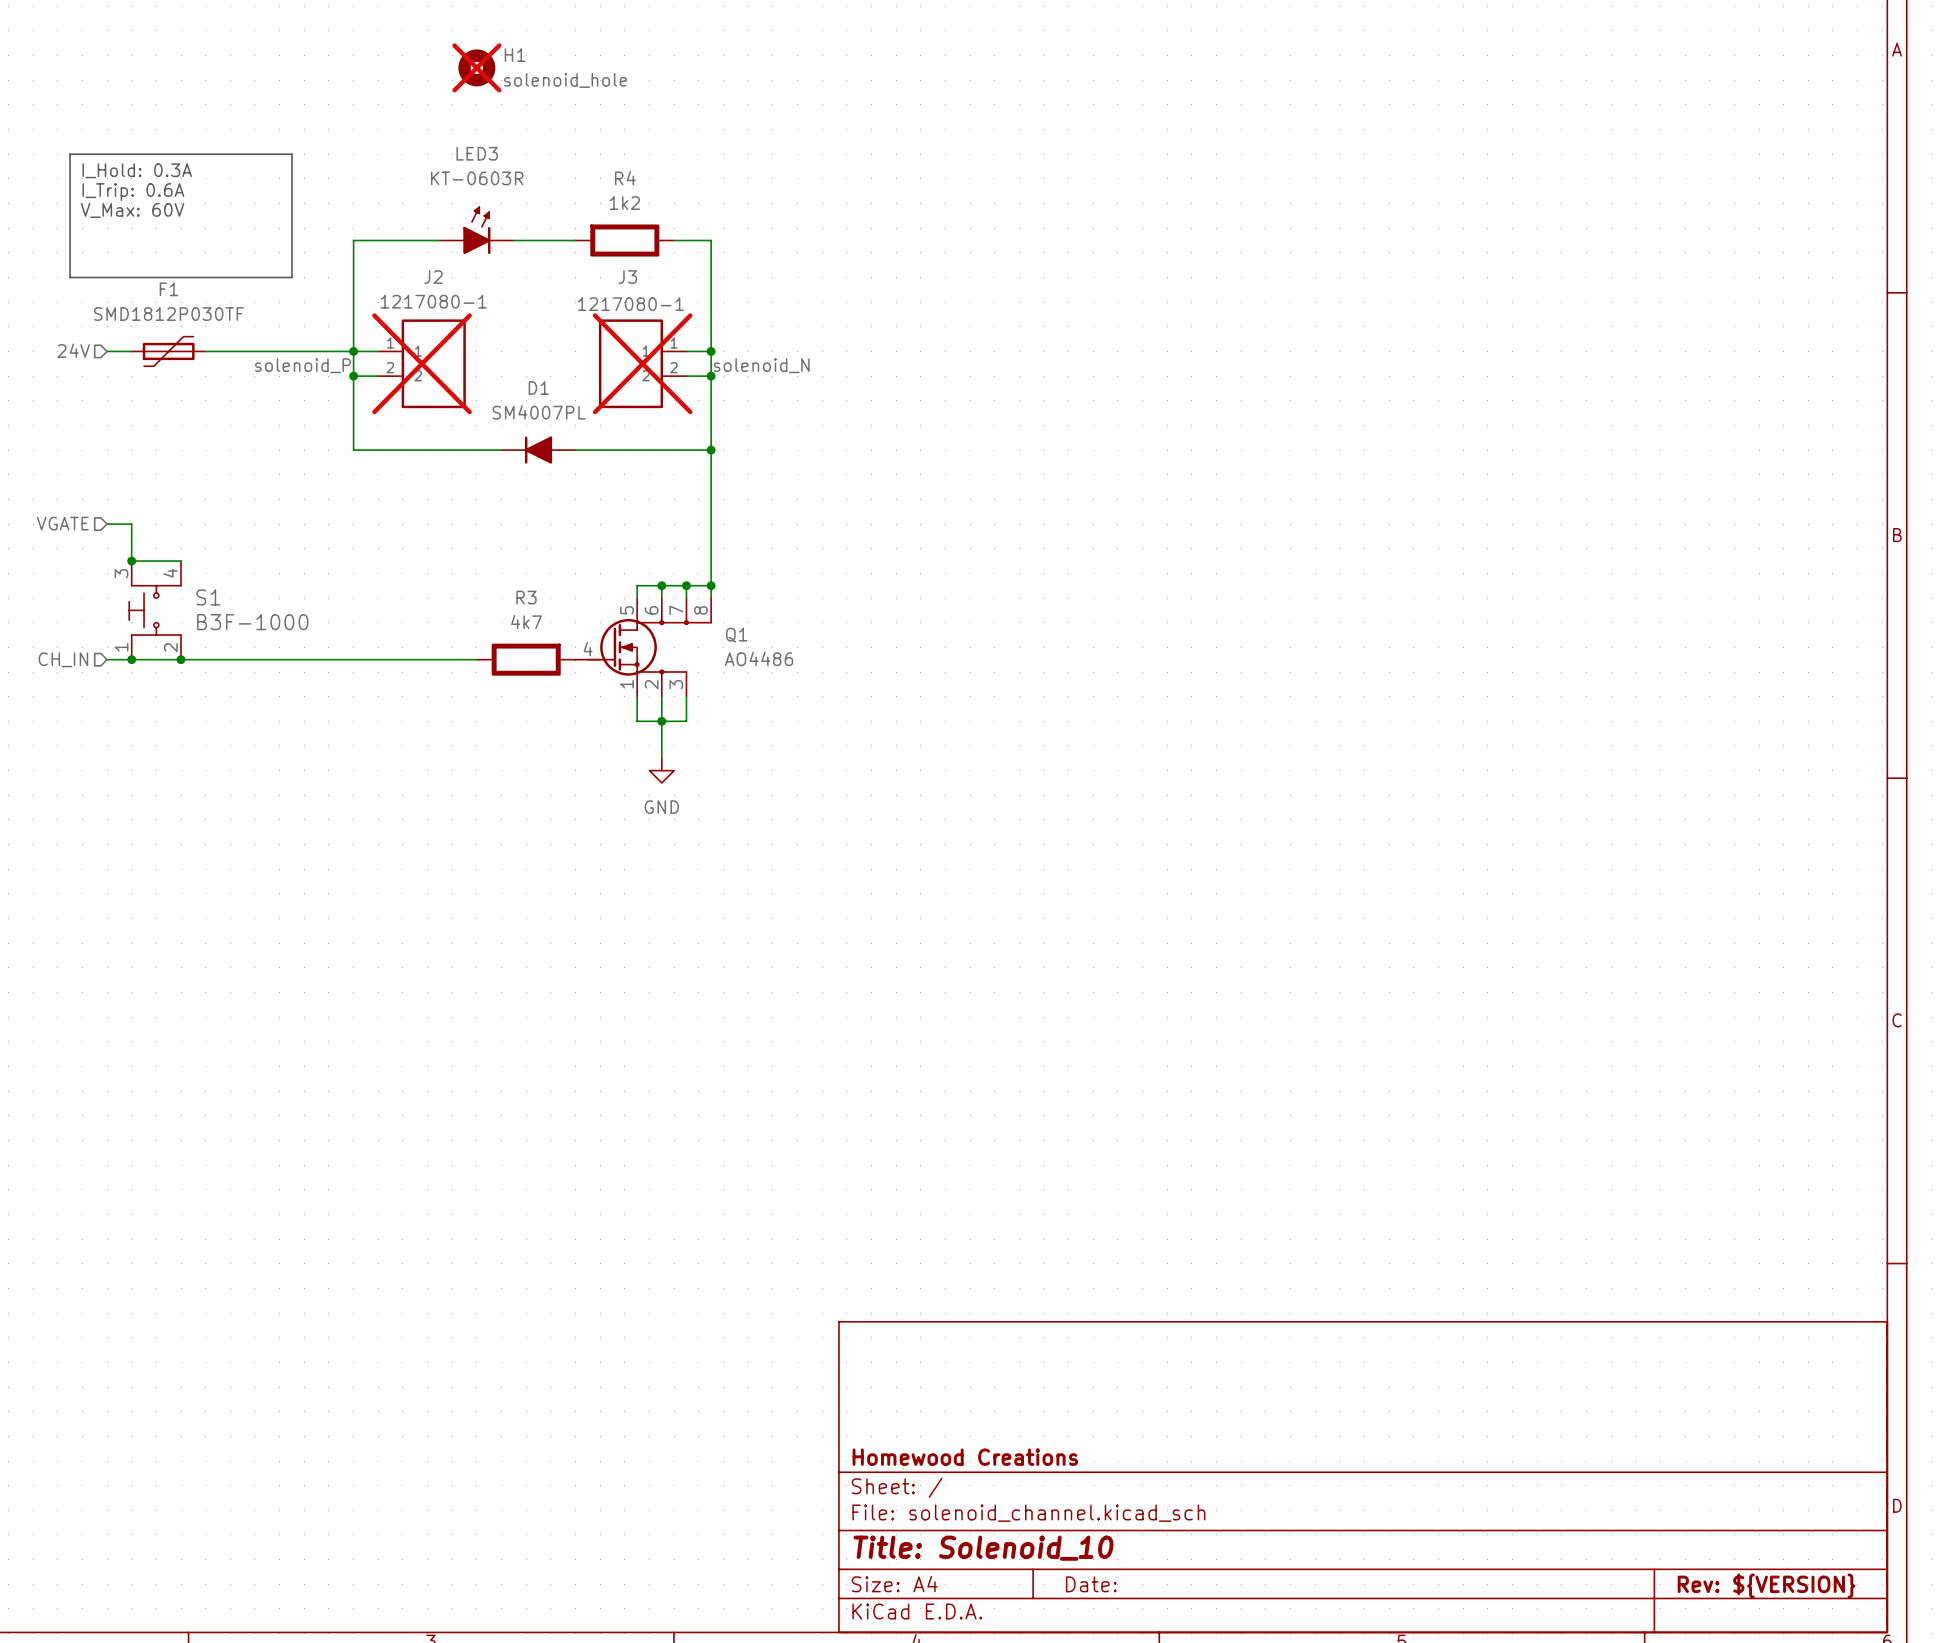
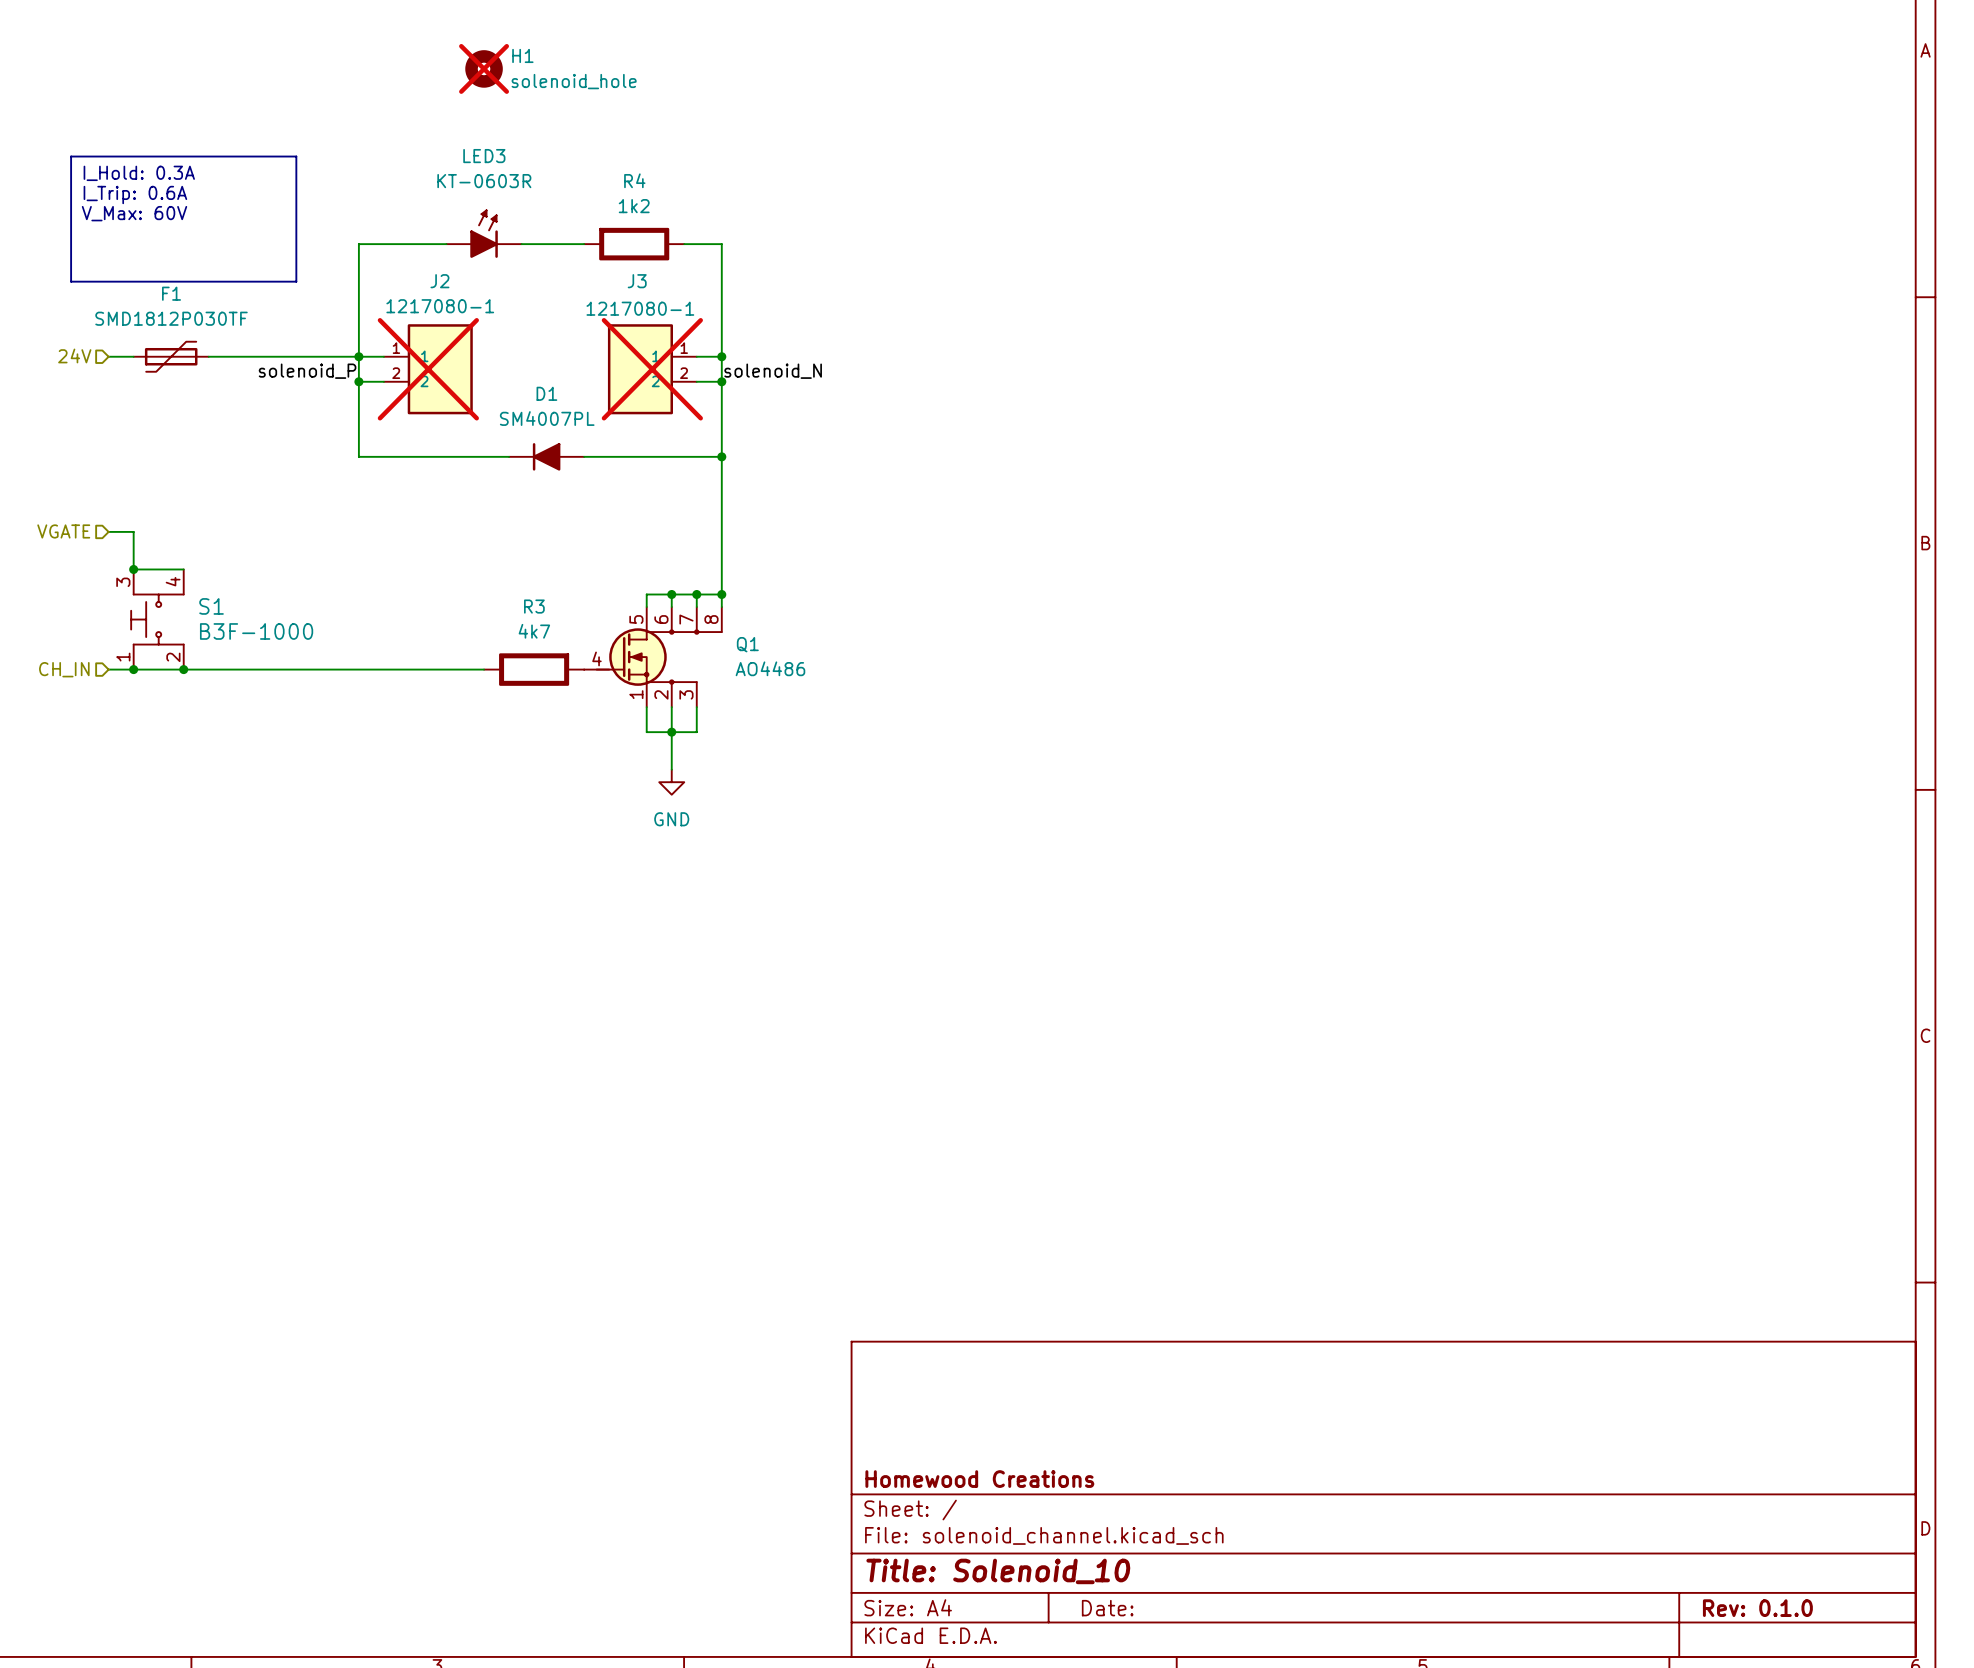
title block: Rev: ${VERSION} (1766, 1586) -> Rev: 0.1.0 (1757, 1608)

